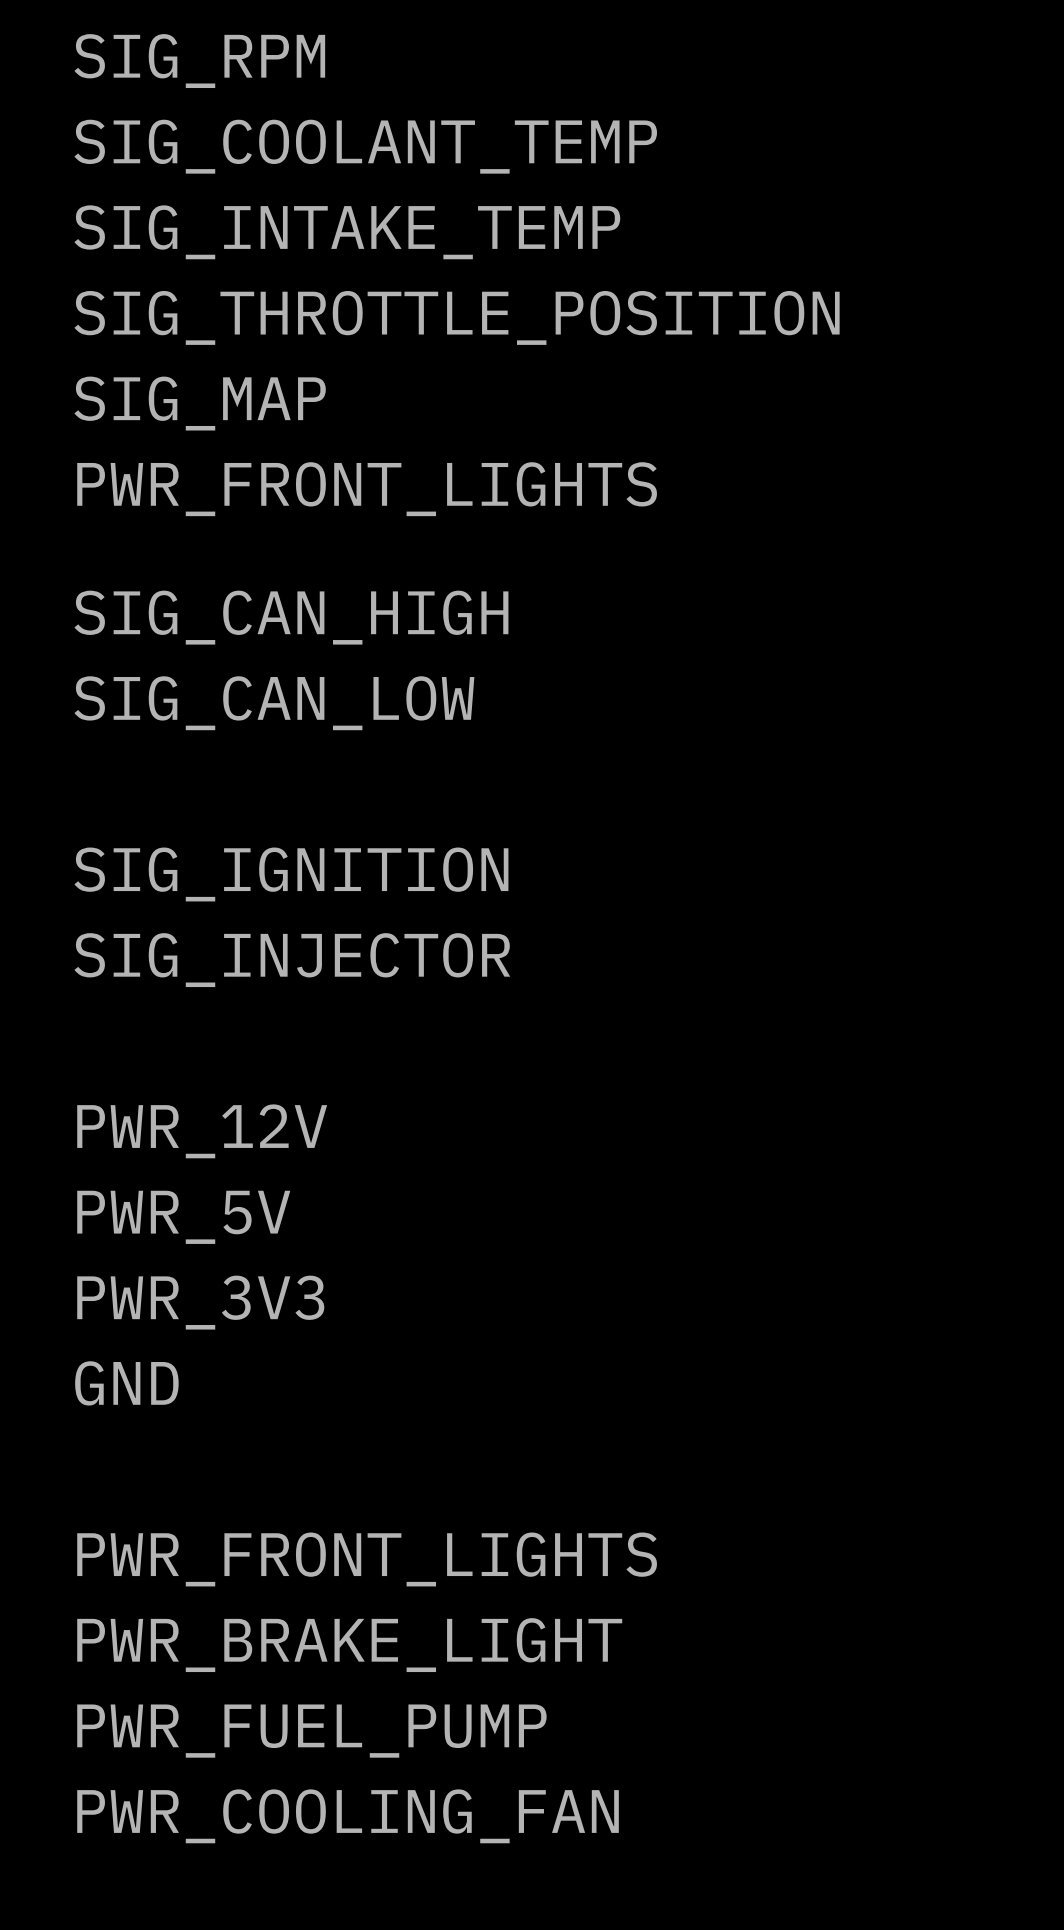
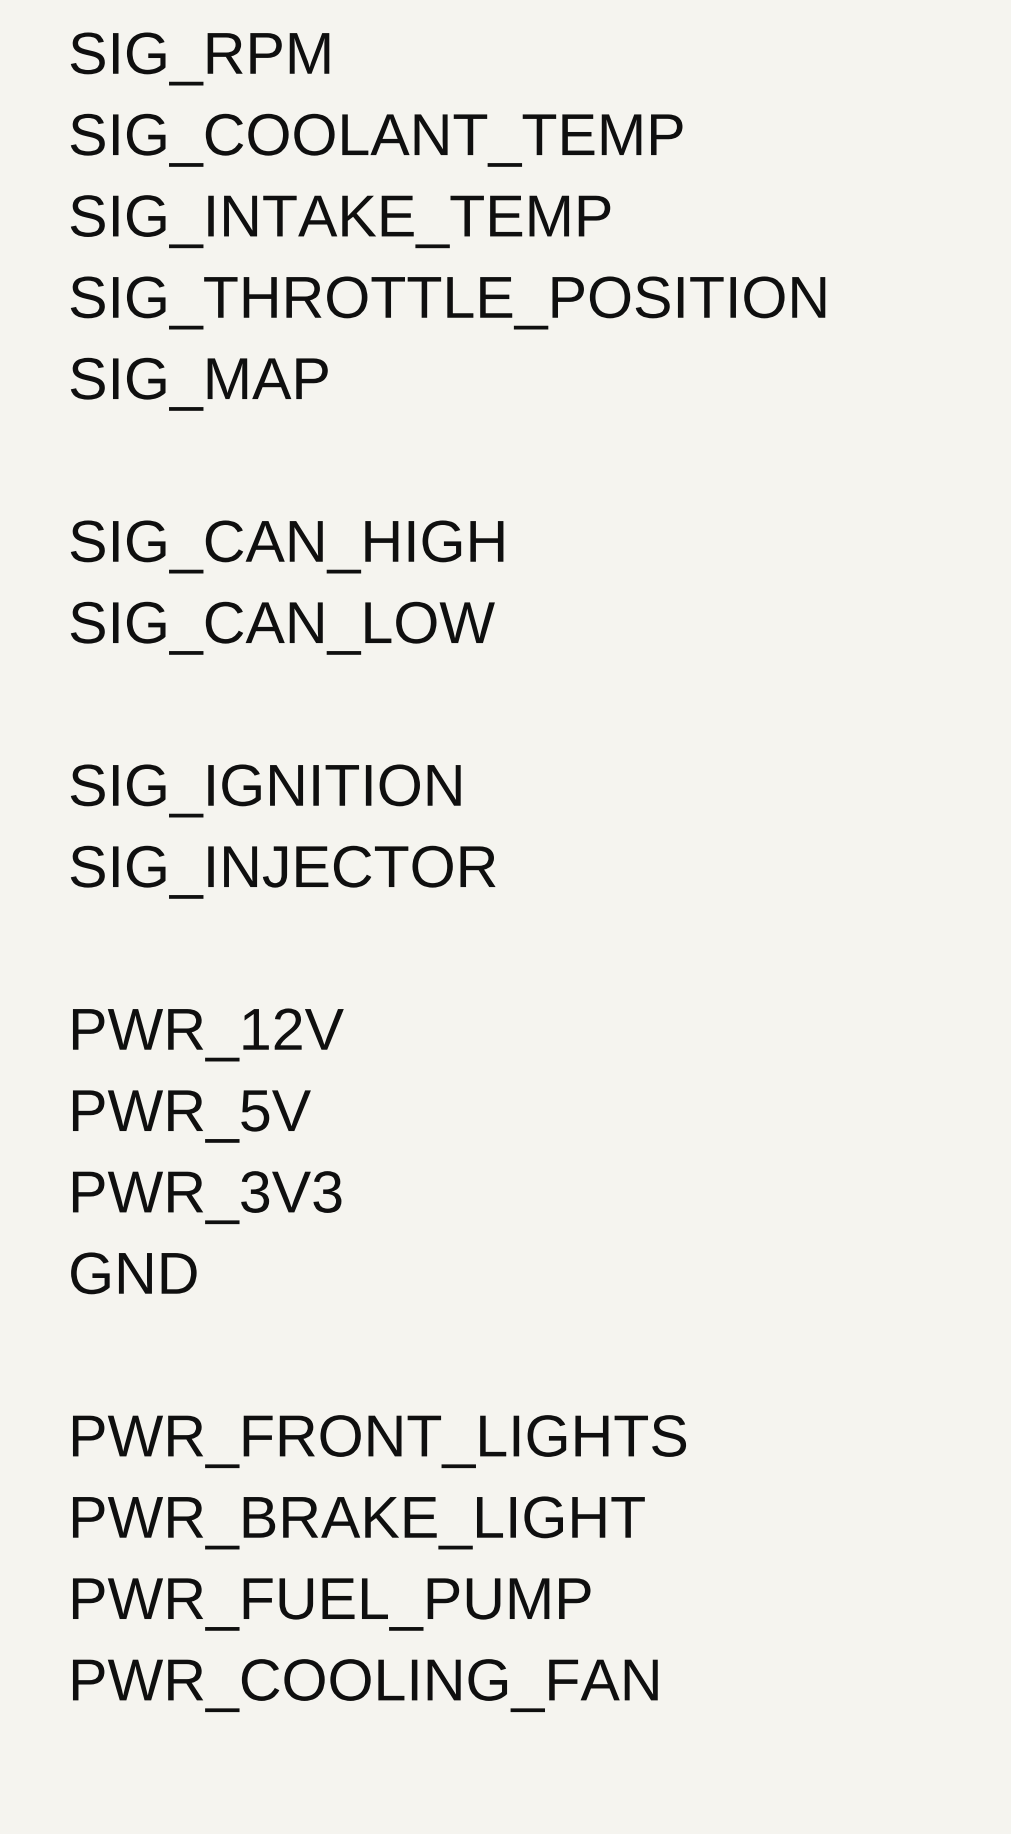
label: PWR_FRONT_LIGHTS (367, 489) -> none
label position: SIG_CAN_HIGH (291, 617) -> SIG_CAN_HIGH (287, 546)
label position: SIG_CAN_LOW (274, 703) -> SIG_CAN_LOW (282, 628)
label position: SIG_IGNITION (291, 874) -> SIG_IGNITION (265, 790)
label position: SIG_INJECTOR (292, 960) -> SIG_INJECTOR (283, 872)
label position: PWR_12V (202, 1131) -> PWR_12V (208, 1034)
label position: PWR_5V (183, 1217) -> PWR_5V (191, 1116)
label position: PWR_3V3 (200, 1302) -> PWR_3V3 (207, 1197)
label position: GND (126, 1383) -> GND (133, 1273)
label position: PWR_FRONT_LIGHTS (367, 1559) -> PWR_FRONT_LIGHTS (379, 1441)
label position: PWR_BRAKE_LIGHT (349, 1645) -> PWR_BRAKE_LIGHT (358, 1522)
label position: PWR_FUEL_PUMP (311, 1731) -> PWR_FUEL_PUMP (331, 1604)
label position: PWR_COOLING_FAN (348, 1816) -> PWR_COOLING_FAN (365, 1685)

